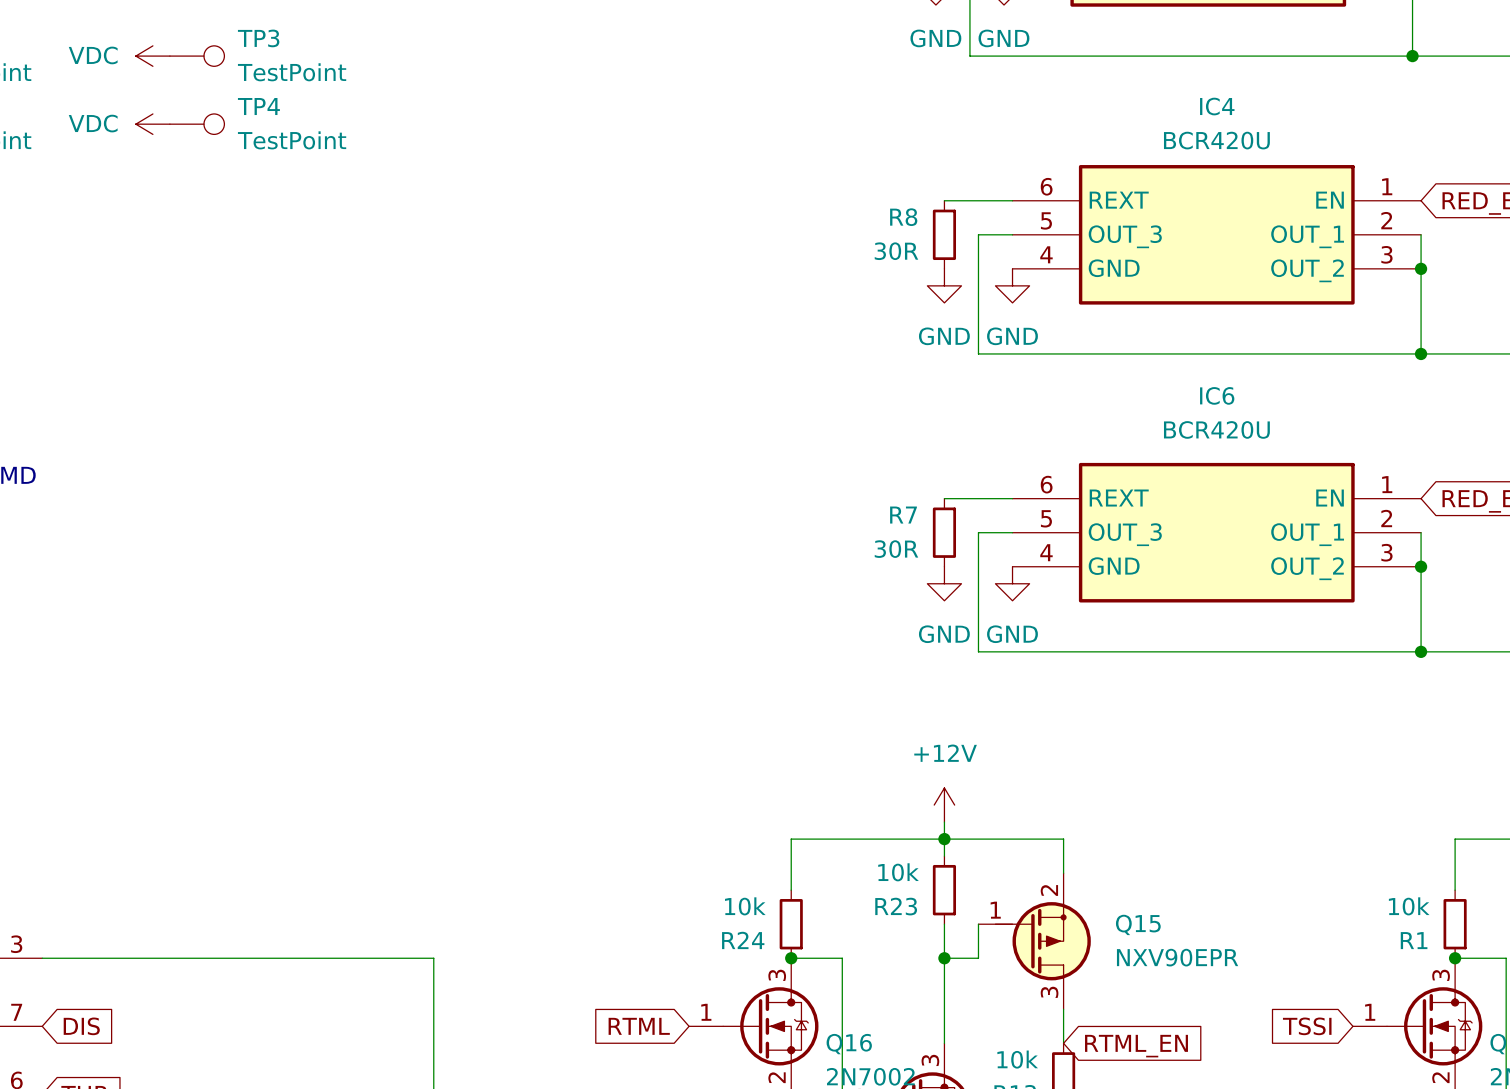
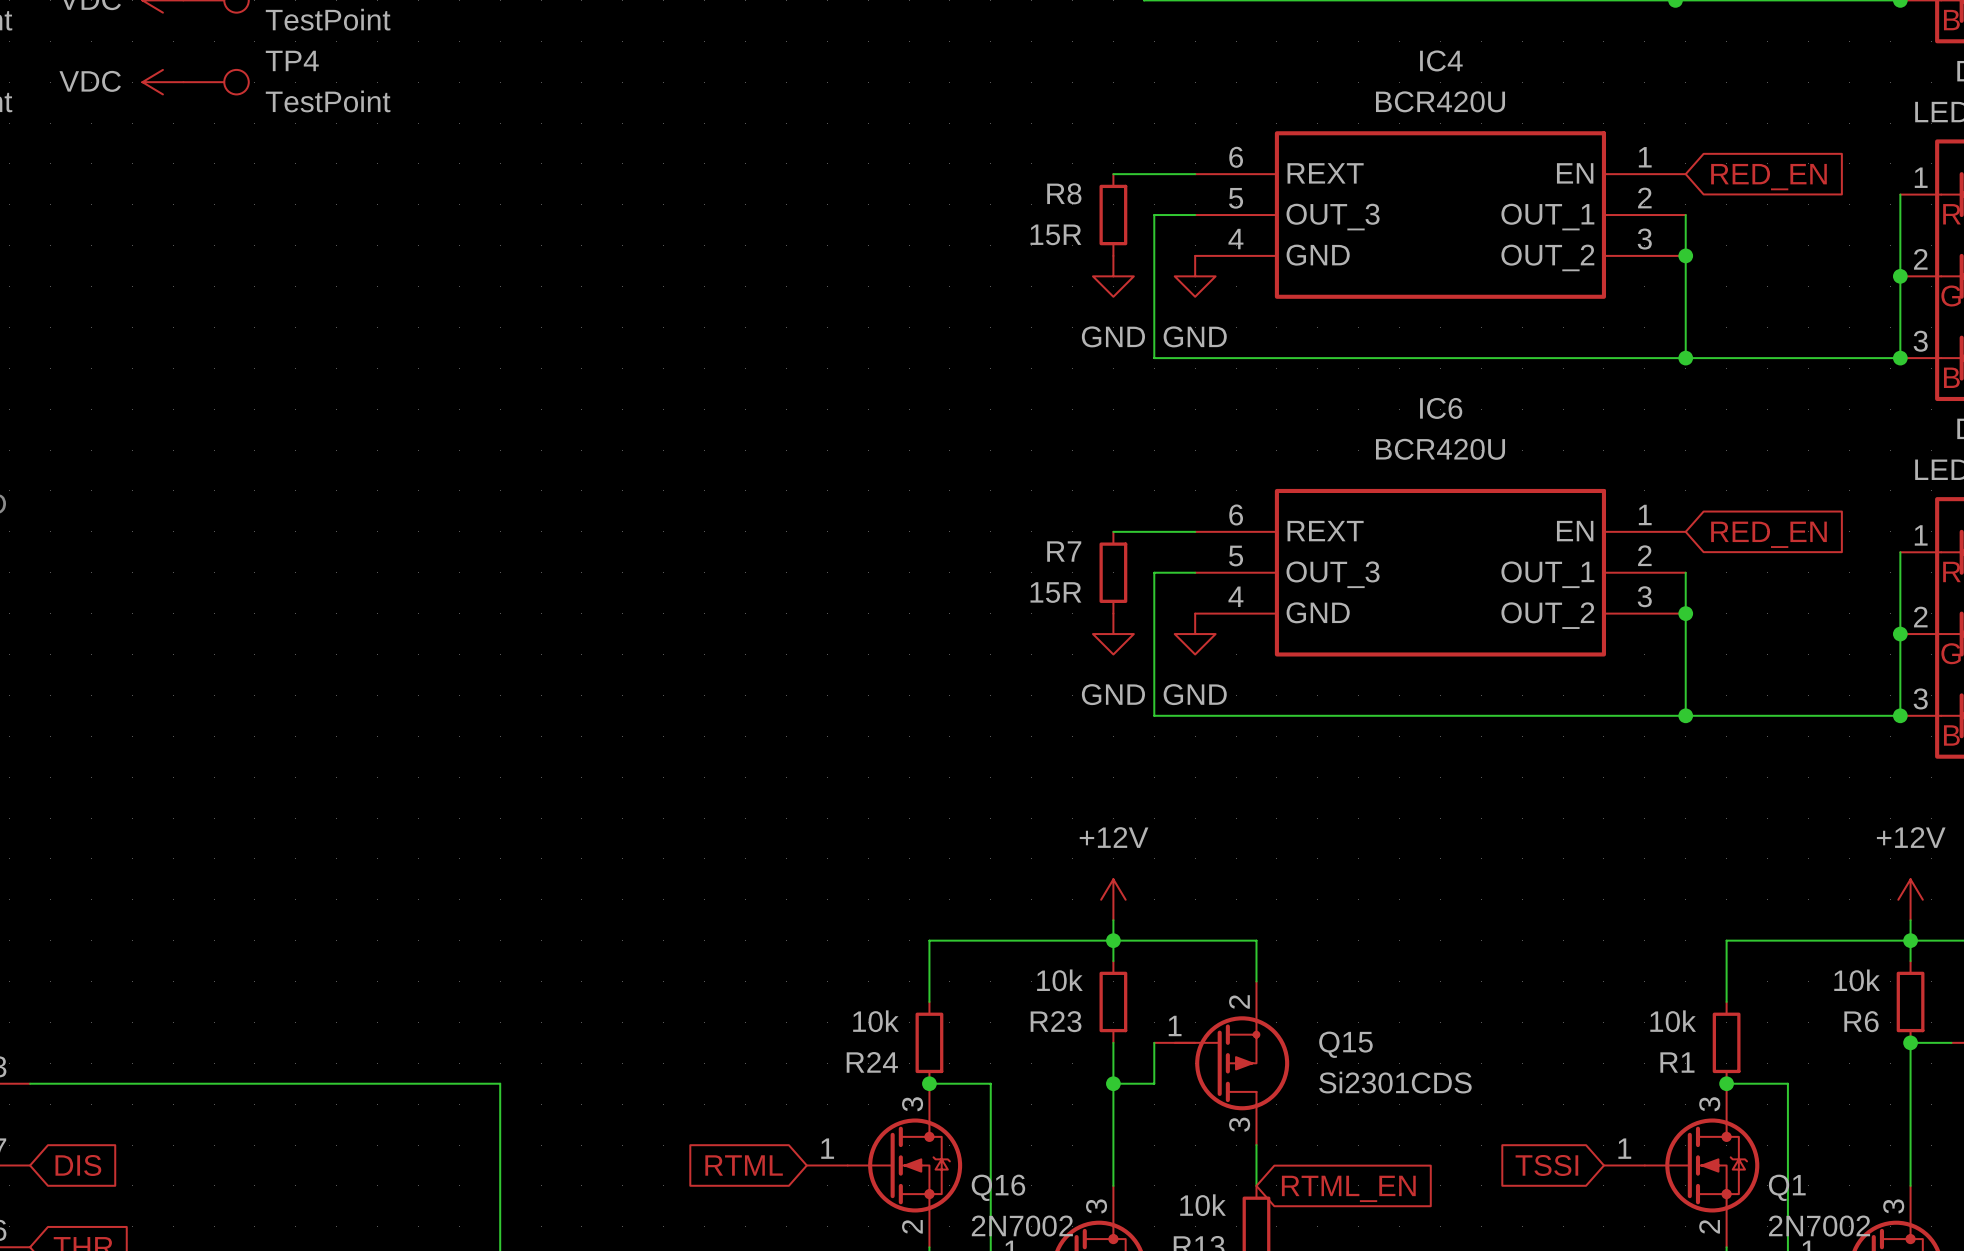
R8 value: 30R (896, 251) -> 15R (1055, 234)
R7 value: 30R (896, 549) -> 15R (1055, 592)
Q15 value: NXV90EPR (1177, 957) -> Si2301CDS (1395, 1082)

